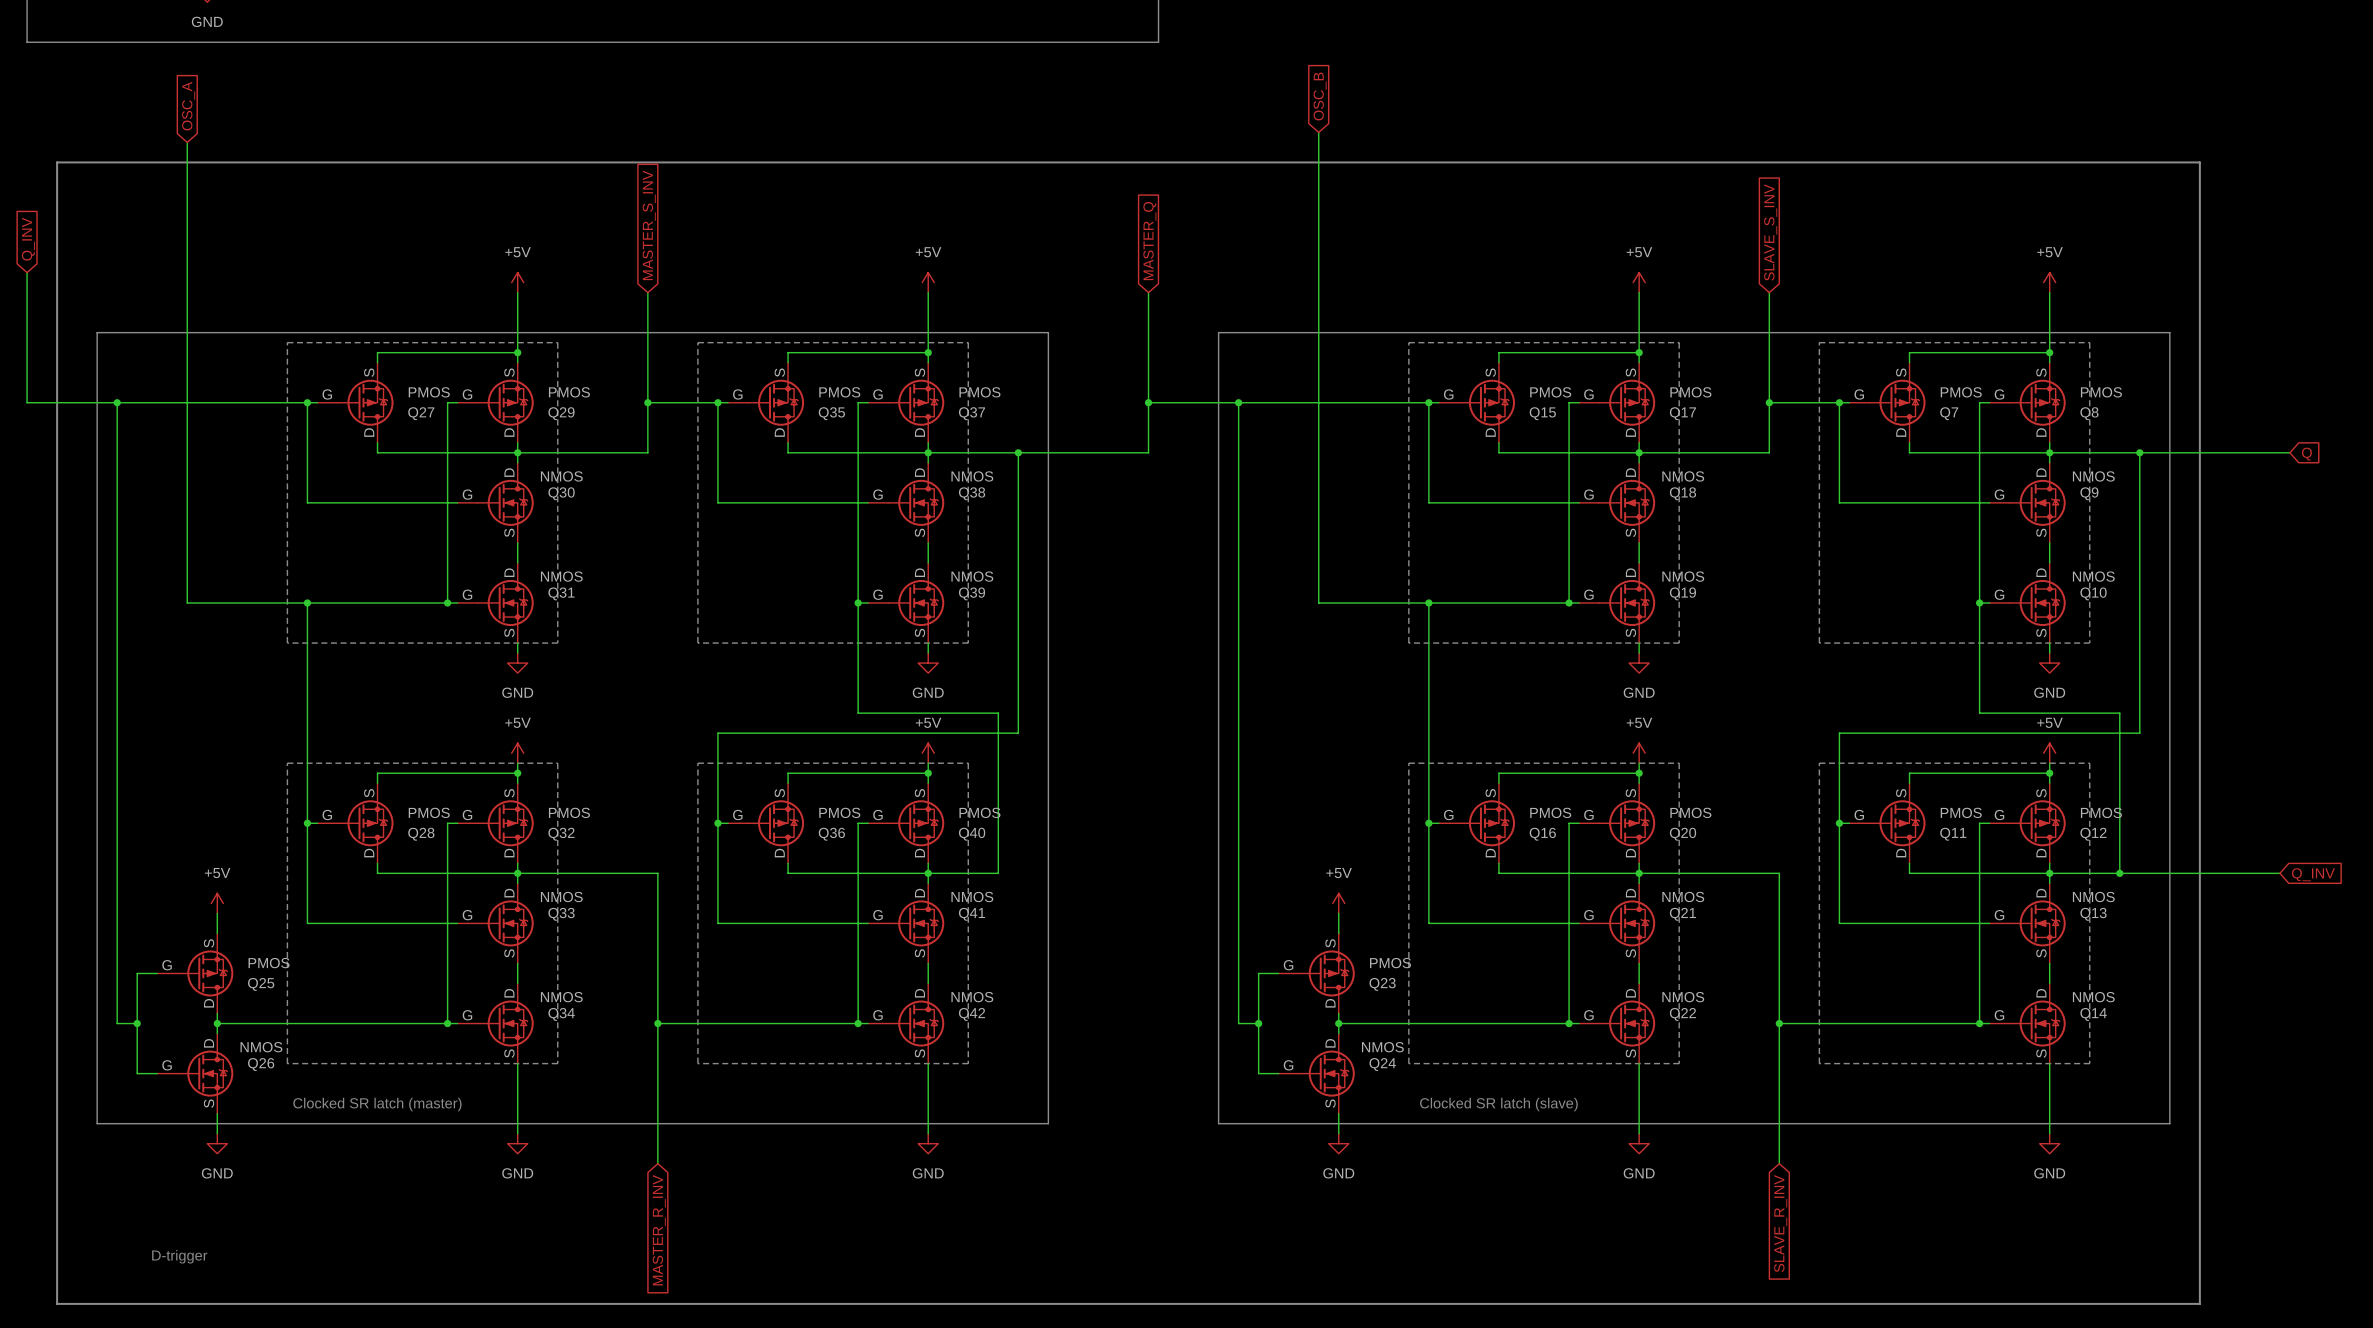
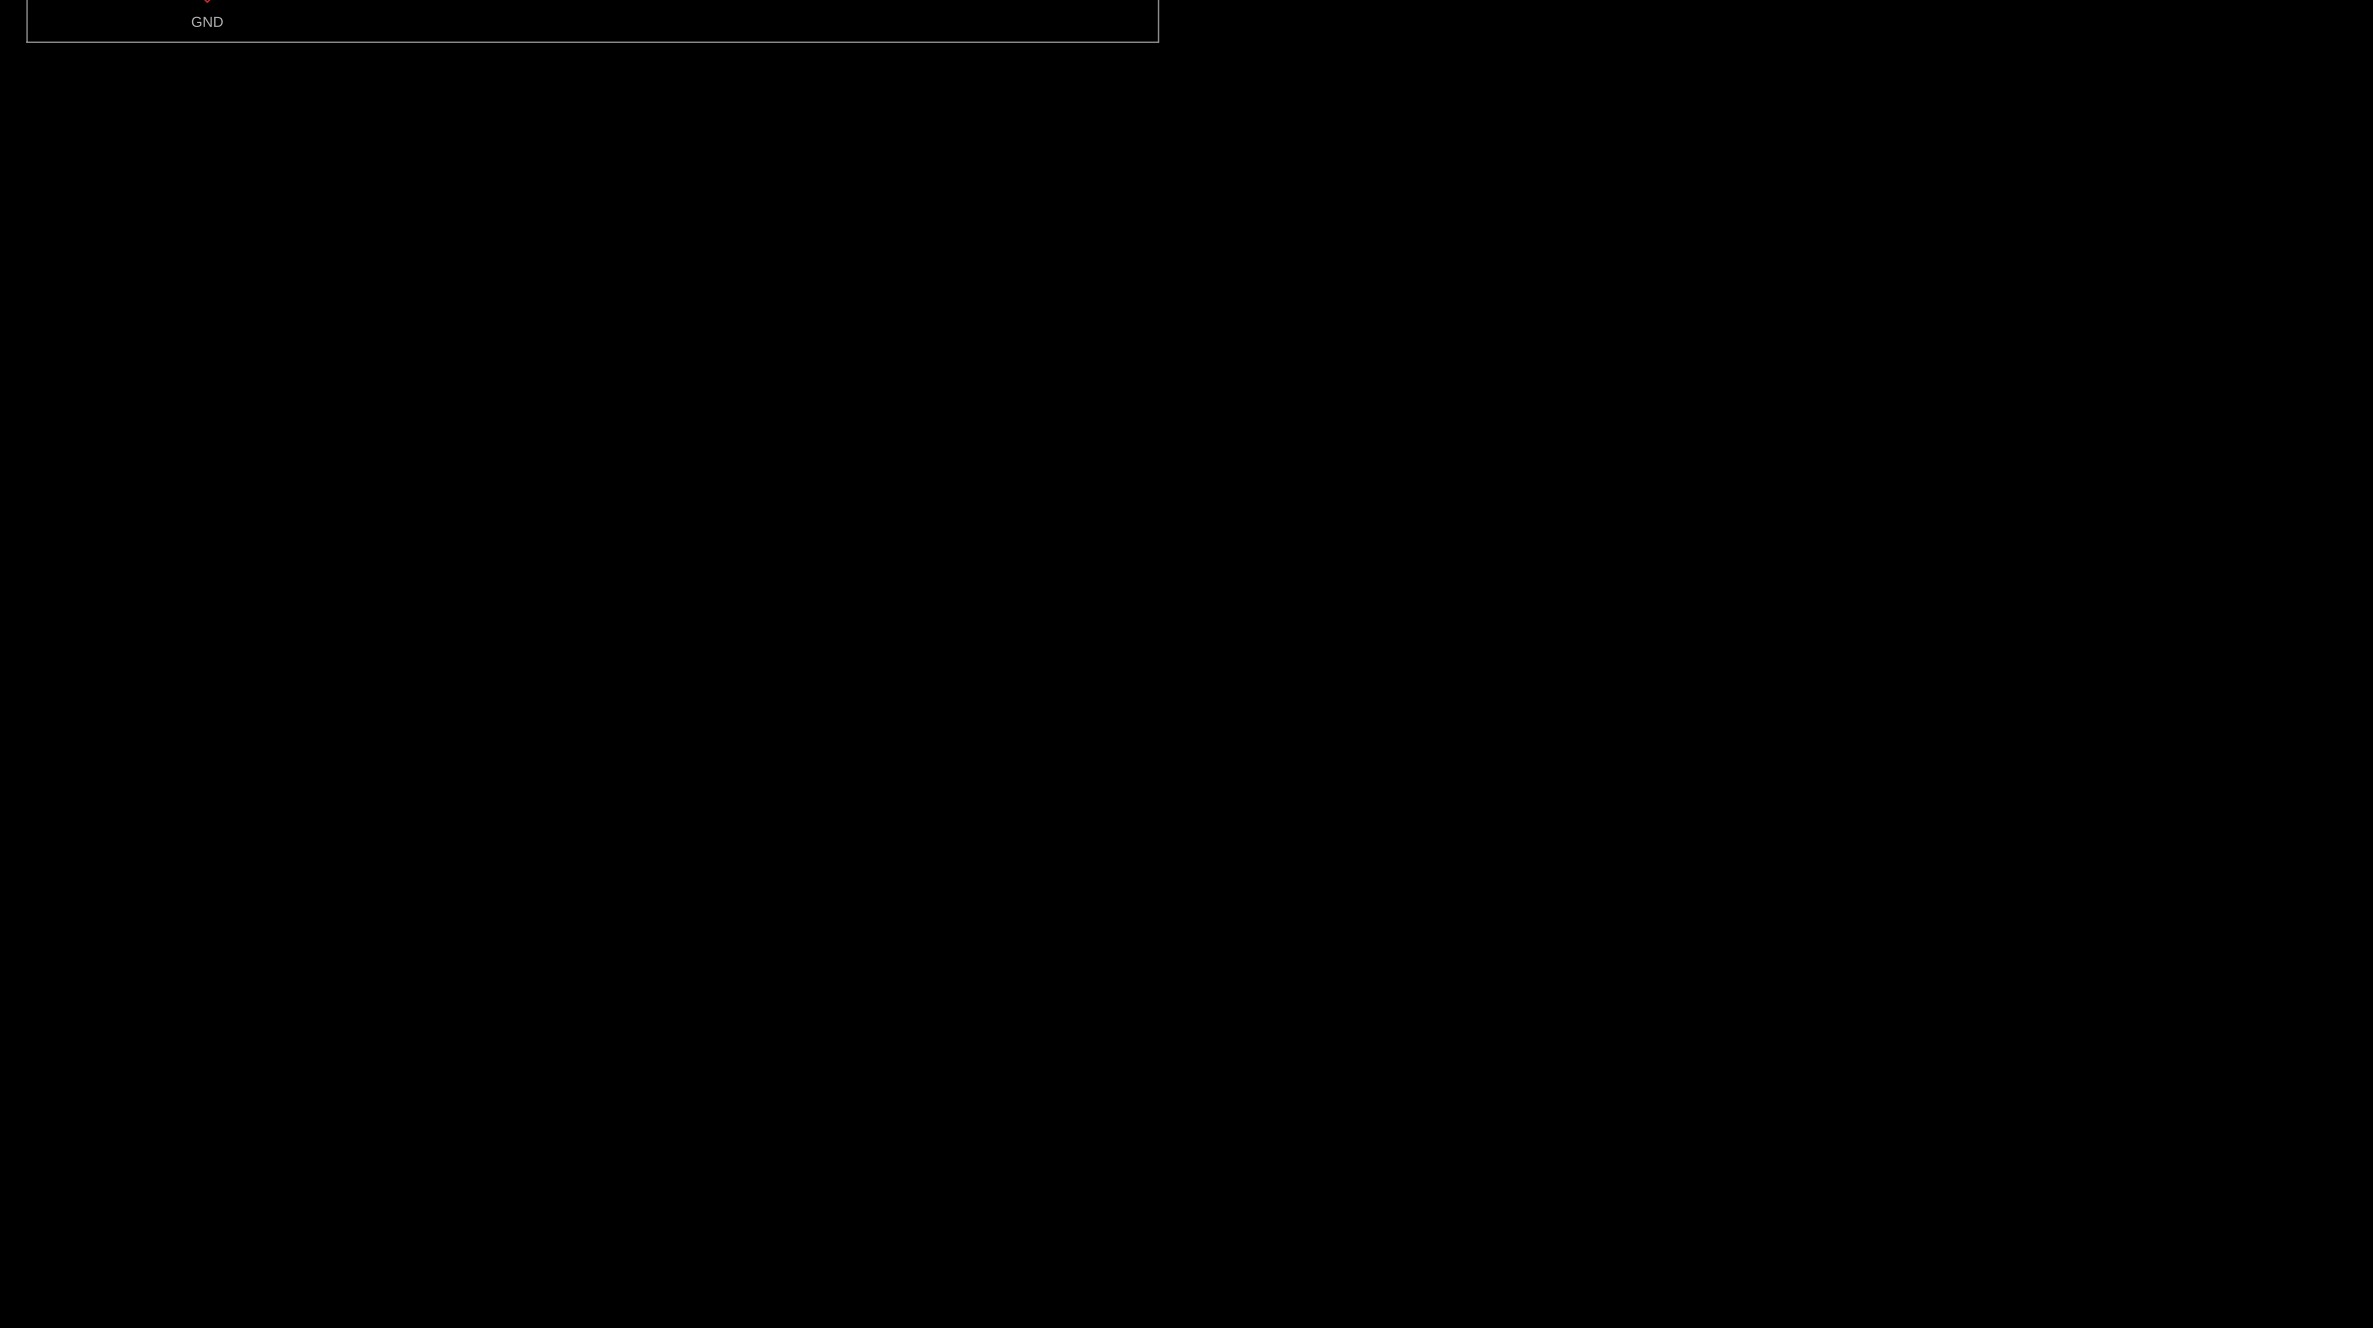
global label: OSC_B (1320, 96) -> none
global label: OSC_A (188, 106) -> none
wire: (1318, 132) (1318, 603) (1579, 603) -> none
wire: (187, 142) (187, 603) (457, 603) -> none
line: (57, 162) (2199, 162) (2199, 1303) (57, 1303) (57, 162) -> none
global label: MASTER_S_INV (649, 225) -> none
global label: SLAVE_S_INV (1770, 232) -> none
global label: Q_INV (28, 239) -> none
global label: MASTER_Q (1149, 241) -> none
wire: (27, 272) (27, 402) (317, 402) -> none
power symbol: +5V (517, 282) -> none
power symbol: +5V (928, 282) -> none
power symbol: +5V (1639, 282) -> none
power symbol: +5V (2049, 282) -> none
wire: (517, 292) (517, 362) -> none
wire: (647, 292) (647, 452) (377, 452) (377, 442) -> none
wire: (928, 292) (928, 362) -> none
wire: (1148, 292) (1148, 452) (788, 452) (788, 442) -> none
wire: (1639, 292) (1639, 362) -> none
wire: (1769, 292) (1769, 452) (1498, 452) (1498, 442) -> none
wire: (2049, 292) (2049, 362) -> none
line: (97, 332) (1048, 332) (1048, 1123) (97, 1123) (97, 332) -> none
line: (1218, 332) (2169, 332) (2169, 1123) (1218, 1123) (1218, 332) -> none
line: (287, 342) (557, 342) (557, 643) (287, 643) (287, 342) -> none
line: (697, 342) (968, 342) (968, 643) (697, 643) (697, 342) -> none
line: (1408, 342) (1679, 342) (1679, 643) (1408, 643) (1408, 342) -> none
line: (1819, 342) (2089, 342) (2089, 643) (1819, 643) (1819, 342) -> none
wire: (517, 352) (377, 352) (377, 362) -> none
junction: (517, 352) -> none
wire: (928, 352) (788, 352) (788, 362) -> none
junction: (928, 352) -> none
wire: (1639, 352) (1498, 352) (1498, 362) -> none
junction: (1639, 352) -> none
wire: (2049, 352) (1909, 352) (1909, 362) -> none
junction: (2049, 352) -> none
wire: (117, 402) (117, 1023) (137, 1023) -> none
junction: (117, 402) -> none
wire: (307, 402) (307, 502) (457, 502) -> none
junction: (307, 402) -> none
Q27: PMOS (355, 402) -> none
wire: (457, 402) (447, 402) (447, 603) -> none
Q29: PMOS (495, 402) -> none
wire: (647, 402) (727, 402) -> none
junction: (647, 402) -> none
wire: (717, 402) (717, 502) (868, 502) -> none
junction: (717, 402) -> none
Q35: PMOS (766, 402) -> none
wire: (868, 402) (858, 402) (858, 713) (998, 713) (998, 873) (788, 873) (788, 863) -> none
Q37: PMOS (906, 402) -> none
wire: (1148, 402) (1438, 402) -> none
junction: (1148, 402) -> none
wire: (1238, 402) (1238, 1023) (1258, 1023) -> none
junction: (1238, 402) -> none
wire: (1428, 402) (1428, 502) (1579, 502) -> none
junction: (1428, 402) -> none
Q15: PMOS (1476, 402) -> none
wire: (1579, 402) (1569, 402) (1569, 603) -> none
Q17: PMOS (1617, 402) -> none
wire: (1769, 402) (1849, 402) -> none
junction: (1769, 402) -> none
wire: (1839, 402) (1839, 502) (1989, 502) -> none
junction: (1839, 402) -> none
Q7: PMOS (1887, 402) -> none
wire: (1989, 402) (1979, 402) (1979, 713) (2119, 713) (2119, 873) -> none
Q8: PMOS (2027, 402) -> none
wire: (517, 442) (517, 462) -> none
wire: (928, 442) (928, 462) -> none
wire: (1639, 442) (1639, 462) -> none
wire: (1909, 442) (1909, 452) (2289, 452) -> none
wire: (2049, 442) (2049, 462) -> none
junction: (517, 452) -> none
junction: (928, 452) -> none
wire: (1018, 452) (1018, 733) (717, 733) (717, 923) (868, 923) -> none
junction: (1018, 452) -> none
junction: (1639, 452) -> none
junction: (2049, 452) -> none
wire: (2139, 452) (2139, 733) (1839, 733) (1839, 923) (1989, 923) -> none
junction: (2139, 452) -> none
global label: Q (2306, 454) -> none
Q30: NMOS (495, 502) -> none
Q38: NMOS (906, 502) -> none
Q18: NMOS (1617, 502) -> none
Q9: NMOS (2027, 502) -> none
wire: (517, 542) (517, 562) -> none
wire: (928, 542) (928, 562) -> none
wire: (1639, 542) (1639, 562) -> none
wire: (2049, 542) (2049, 562) -> none
wire: (307, 603) (307, 923) (457, 923) -> none
junction: (307, 603) -> none
junction: (447, 603) -> none
Q31: NMOS (495, 603) -> none
wire: (858, 603) (868, 603) -> none
junction: (858, 603) -> none
Q39: NMOS (906, 603) -> none
wire: (1428, 603) (1428, 923) (1579, 923) -> none
junction: (1428, 603) -> none
junction: (1569, 603) -> none
Q19: NMOS (1617, 603) -> none
wire: (1979, 603) (1989, 603) -> none
junction: (1979, 603) -> none
Q10: NMOS (2027, 603) -> none
wire: (517, 643) (517, 653) -> none
wire: (928, 643) (928, 653) -> none
wire: (1639, 643) (1639, 653) -> none
wire: (2049, 643) (2049, 653) -> none
power symbol: GND (517, 663) -> none
power symbol: GND (928, 663) -> none
power symbol: GND (1639, 663) -> none
power symbol: GND (2049, 663) -> none
power symbol: +5V (517, 753) -> none
power symbol: +5V (928, 753) -> none
power symbol: +5V (1639, 753) -> none
power symbol: +5V (2049, 753) -> none
line: (287, 763) (287, 1063) (557, 1063) (557, 763) (287, 763) -> none
wire: (517, 763) (517, 783) -> none
line: (697, 763) (697, 1063) (968, 1063) (968, 763) (697, 763) -> none
wire: (928, 763) (928, 783) -> none
line: (1408, 763) (1679, 763) (1679, 1063) (1408, 1063) (1408, 763) -> none
wire: (1639, 763) (1639, 783) -> none
line: (1819, 763) (2089, 763) (2089, 1063) (1819, 1063) (1819, 763) -> none
wire: (2049, 763) (2049, 783) -> none
wire: (517, 773) (377, 773) (377, 783) -> none
junction: (517, 773) -> none
wire: (928, 773) (788, 773) (788, 783) -> none
junction: (928, 773) -> none
wire: (1639, 773) (1498, 773) (1498, 783) -> none
junction: (1639, 773) -> none
wire: (2049, 773) (1909, 773) (1909, 783) -> none
junction: (2049, 773) -> none
wire: (307, 823) (317, 823) -> none
junction: (307, 823) -> none
Q28: PMOS (355, 823) -> none
wire: (457, 823) (447, 823) (447, 1023) -> none
Q32: PMOS (495, 823) -> none
wire: (717, 823) (727, 823) -> none
junction: (717, 823) -> none
Q36: PMOS (766, 823) -> none
wire: (868, 823) (858, 823) (858, 1023) -> none
Q40: PMOS (906, 823) -> none
wire: (1428, 823) (1438, 823) -> none
junction: (1428, 823) -> none
Q16: PMOS (1476, 823) -> none
wire: (1579, 823) (1569, 823) (1569, 1023) -> none
Q20: PMOS (1617, 823) -> none
wire: (1839, 823) (1849, 823) -> none
junction: (1839, 823) -> none
Q11: PMOS (1887, 823) -> none
wire: (1989, 823) (1979, 823) (1979, 1023) -> none
Q12: PMOS (2027, 823) -> none
wire: (377, 863) (377, 873) (657, 873) (657, 1163) -> none
wire: (517, 863) (517, 883) -> none
wire: (928, 863) (928, 883) -> none
wire: (1498, 863) (1498, 873) (1779, 873) (1779, 1163) -> none
wire: (1639, 863) (1639, 883) -> none
wire: (1909, 863) (1909, 873) (2279, 873) -> none
wire: (2049, 863) (2049, 883) -> none
junction: (517, 873) -> none
junction: (928, 873) -> none
junction: (1639, 873) -> none
junction: (2049, 873) -> none
junction: (2119, 873) -> none
global label: Q_INV (2313, 874) -> none
power symbol: +5V (217, 903) -> none
power symbol: +5V (1338, 903) -> none
wire: (217, 913) (217, 933) -> none
wire: (1338, 913) (1338, 933) -> none
Q33: NMOS (495, 923) -> none
Q41: NMOS (906, 923) -> none
Q21: NMOS (1617, 923) -> none
Q13: NMOS (2027, 923) -> none
wire: (517, 963) (517, 983) -> none
wire: (928, 963) (928, 983) -> none
wire: (1639, 963) (1639, 983) -> none
wire: (2049, 963) (2049, 983) -> none
wire: (157, 973) (137, 973) (137, 1073) (157, 1073) -> none
Q25: PMOS (195, 973) -> none
wire: (1278, 973) (1258, 973) (1258, 1073) (1278, 1073) -> none
Q23: PMOS (1316, 973) -> none
wire: (217, 1013) (217, 1033) -> none
wire: (1338, 1013) (1338, 1033) -> none
junction: (137, 1023) -> none
wire: (217, 1023) (457, 1023) -> none
junction: (217, 1023) -> none
junction: (447, 1023) -> none
Q34: NMOS (495, 1023) -> none
wire: (657, 1023) (868, 1023) -> none
junction: (657, 1023) -> none
junction: (858, 1023) -> none
Q42: NMOS (906, 1023) -> none
junction: (1258, 1023) -> none
wire: (1338, 1023) (1579, 1023) -> none
junction: (1338, 1023) -> none
junction: (1569, 1023) -> none
Q22: NMOS (1617, 1023) -> none
wire: (1779, 1023) (1989, 1023) -> none
junction: (1779, 1023) -> none
junction: (1979, 1023) -> none
Q14: NMOS (2027, 1023) -> none
wire: (517, 1063) (517, 1133) -> none
wire: (928, 1063) (928, 1133) -> none
wire: (1639, 1063) (1639, 1133) -> none
wire: (2049, 1063) (2049, 1133) -> none
Q26: NMOS (195, 1073) -> none
Q24: NMOS (1316, 1073) -> none
text: Clocked SR latch (master) (377, 1104) -> none
text: Clocked SR latch (slave) (1498, 1104) -> none
wire: (217, 1113) (217, 1133) -> none
wire: (1338, 1113) (1338, 1133) -> none
power symbol: GND (217, 1143) -> none
power symbol: GND (517, 1143) -> none
power symbol: GND (928, 1143) -> none
power symbol: GND (1338, 1143) -> none
power symbol: GND (1639, 1143) -> none
power symbol: GND (2049, 1143) -> none
global label: SLAVE_R_INV (1780, 1223) -> none
global label: MASTER_R_INV (659, 1230) -> none
text: D-trigger (179, 1256) -> none

